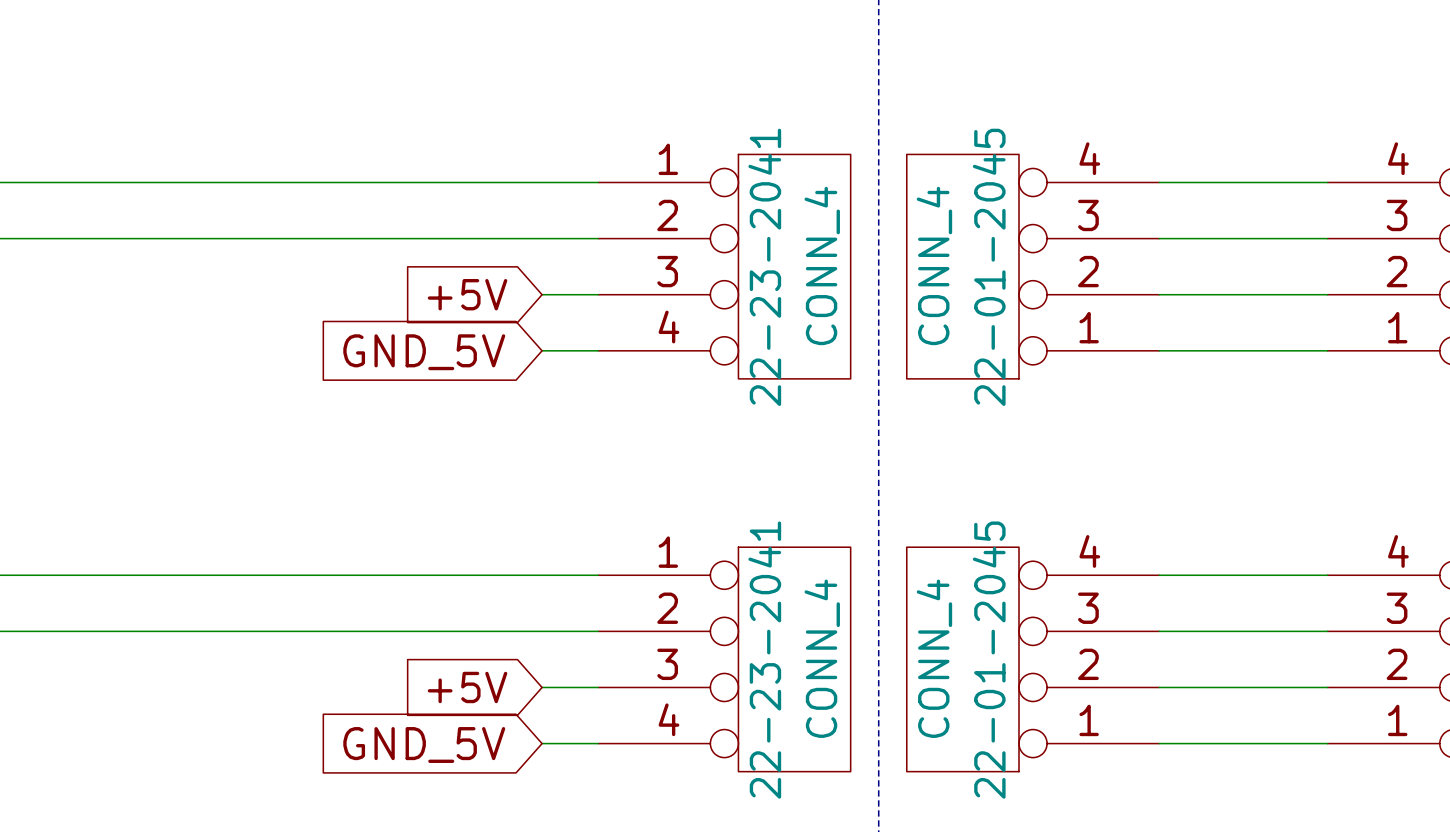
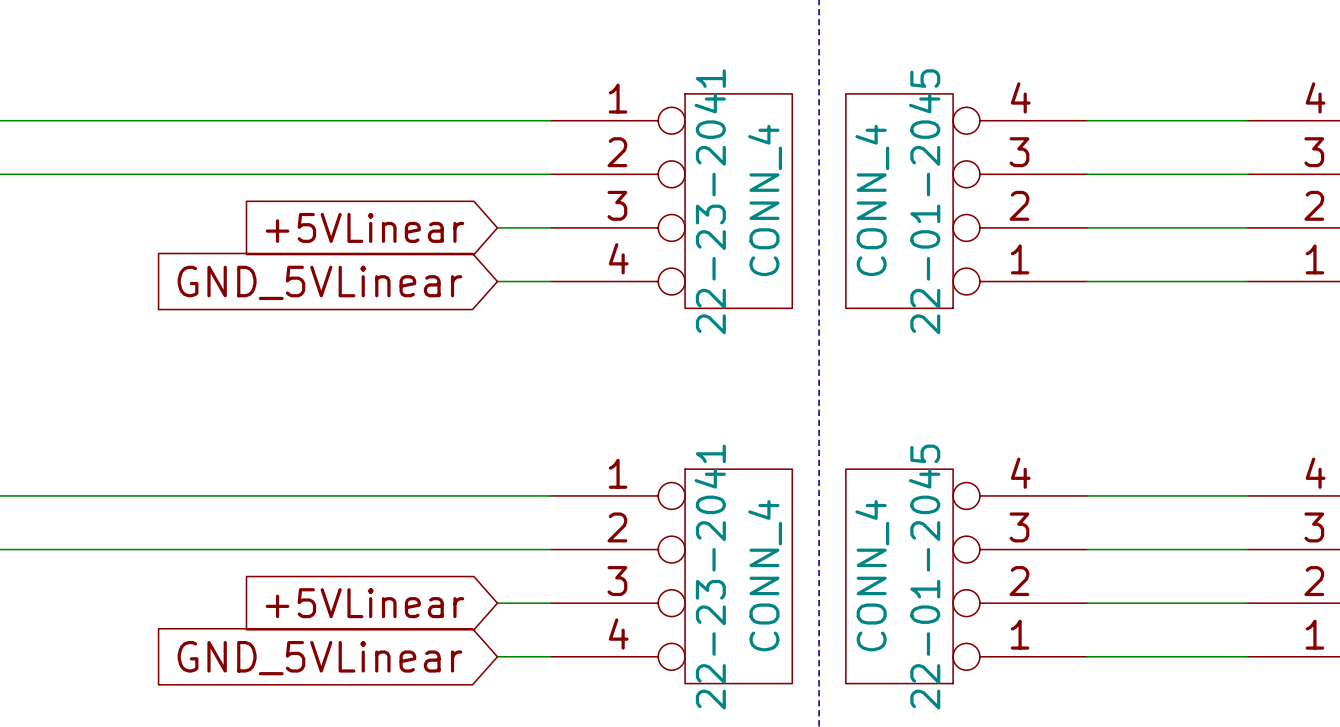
global label: +5V (467, 294) -> +5VLinear (364, 227)
global label: GND_5V (424, 352) -> GND_5VLinear (319, 282)
global label: +5V (467, 687) -> +5VLinear (364, 603)
global label: GND_5V (424, 745) -> GND_5VLinear (319, 658)

